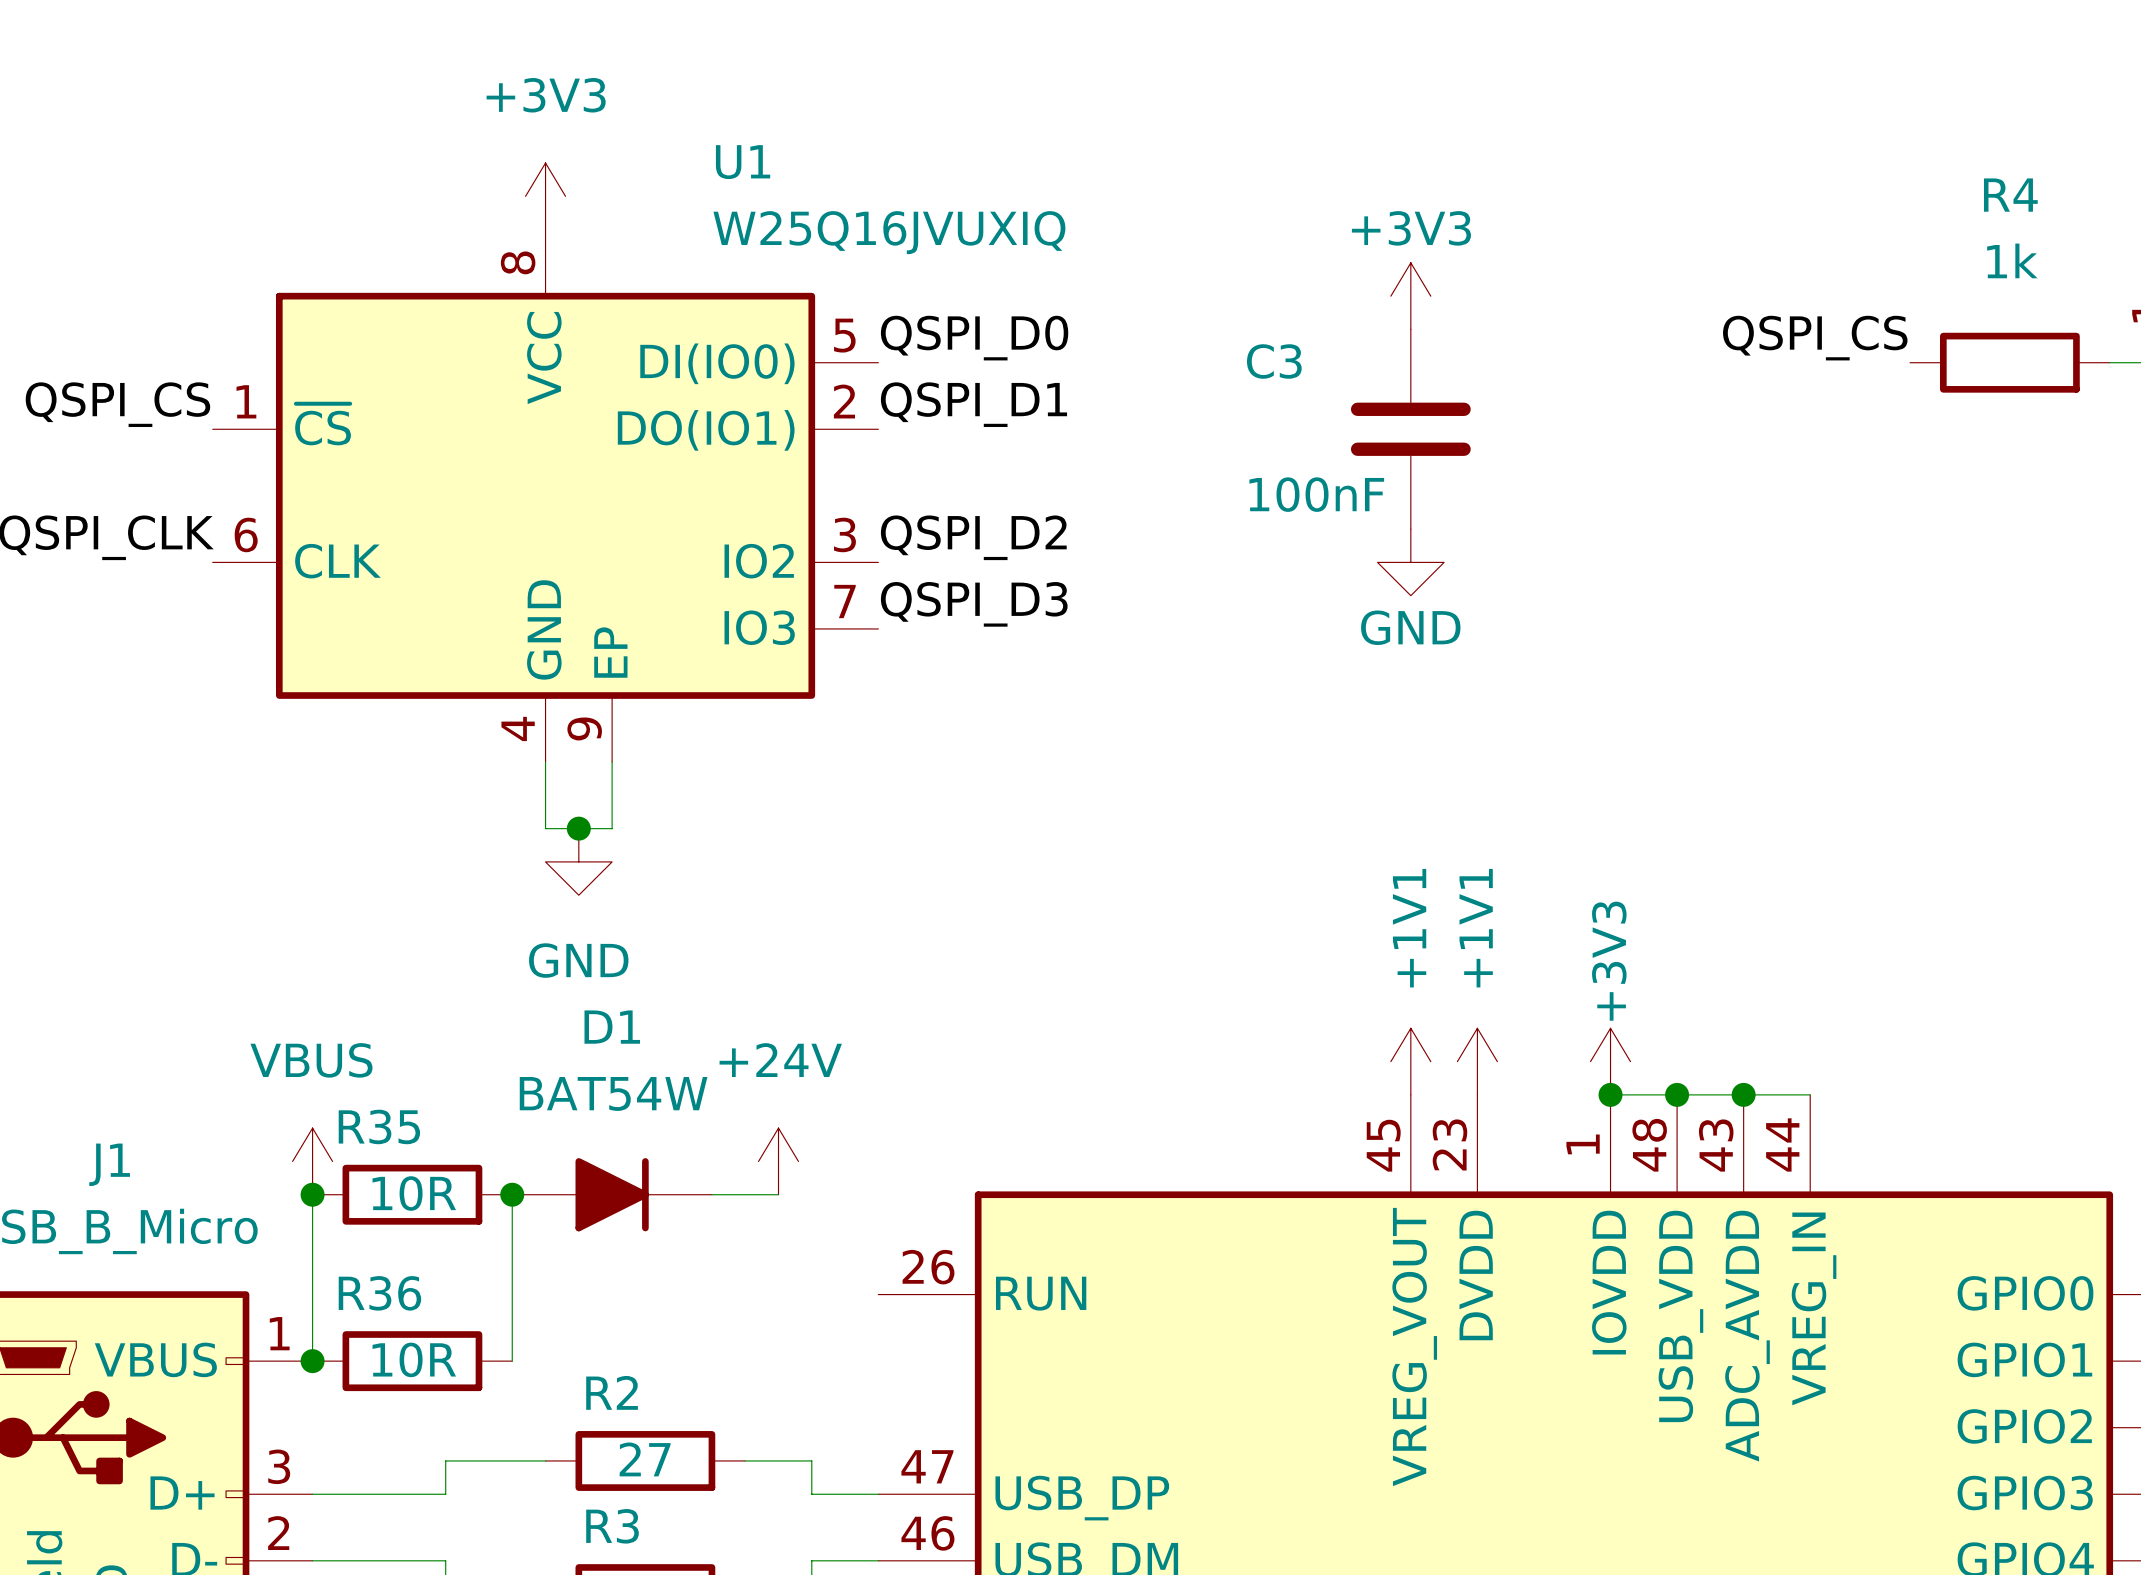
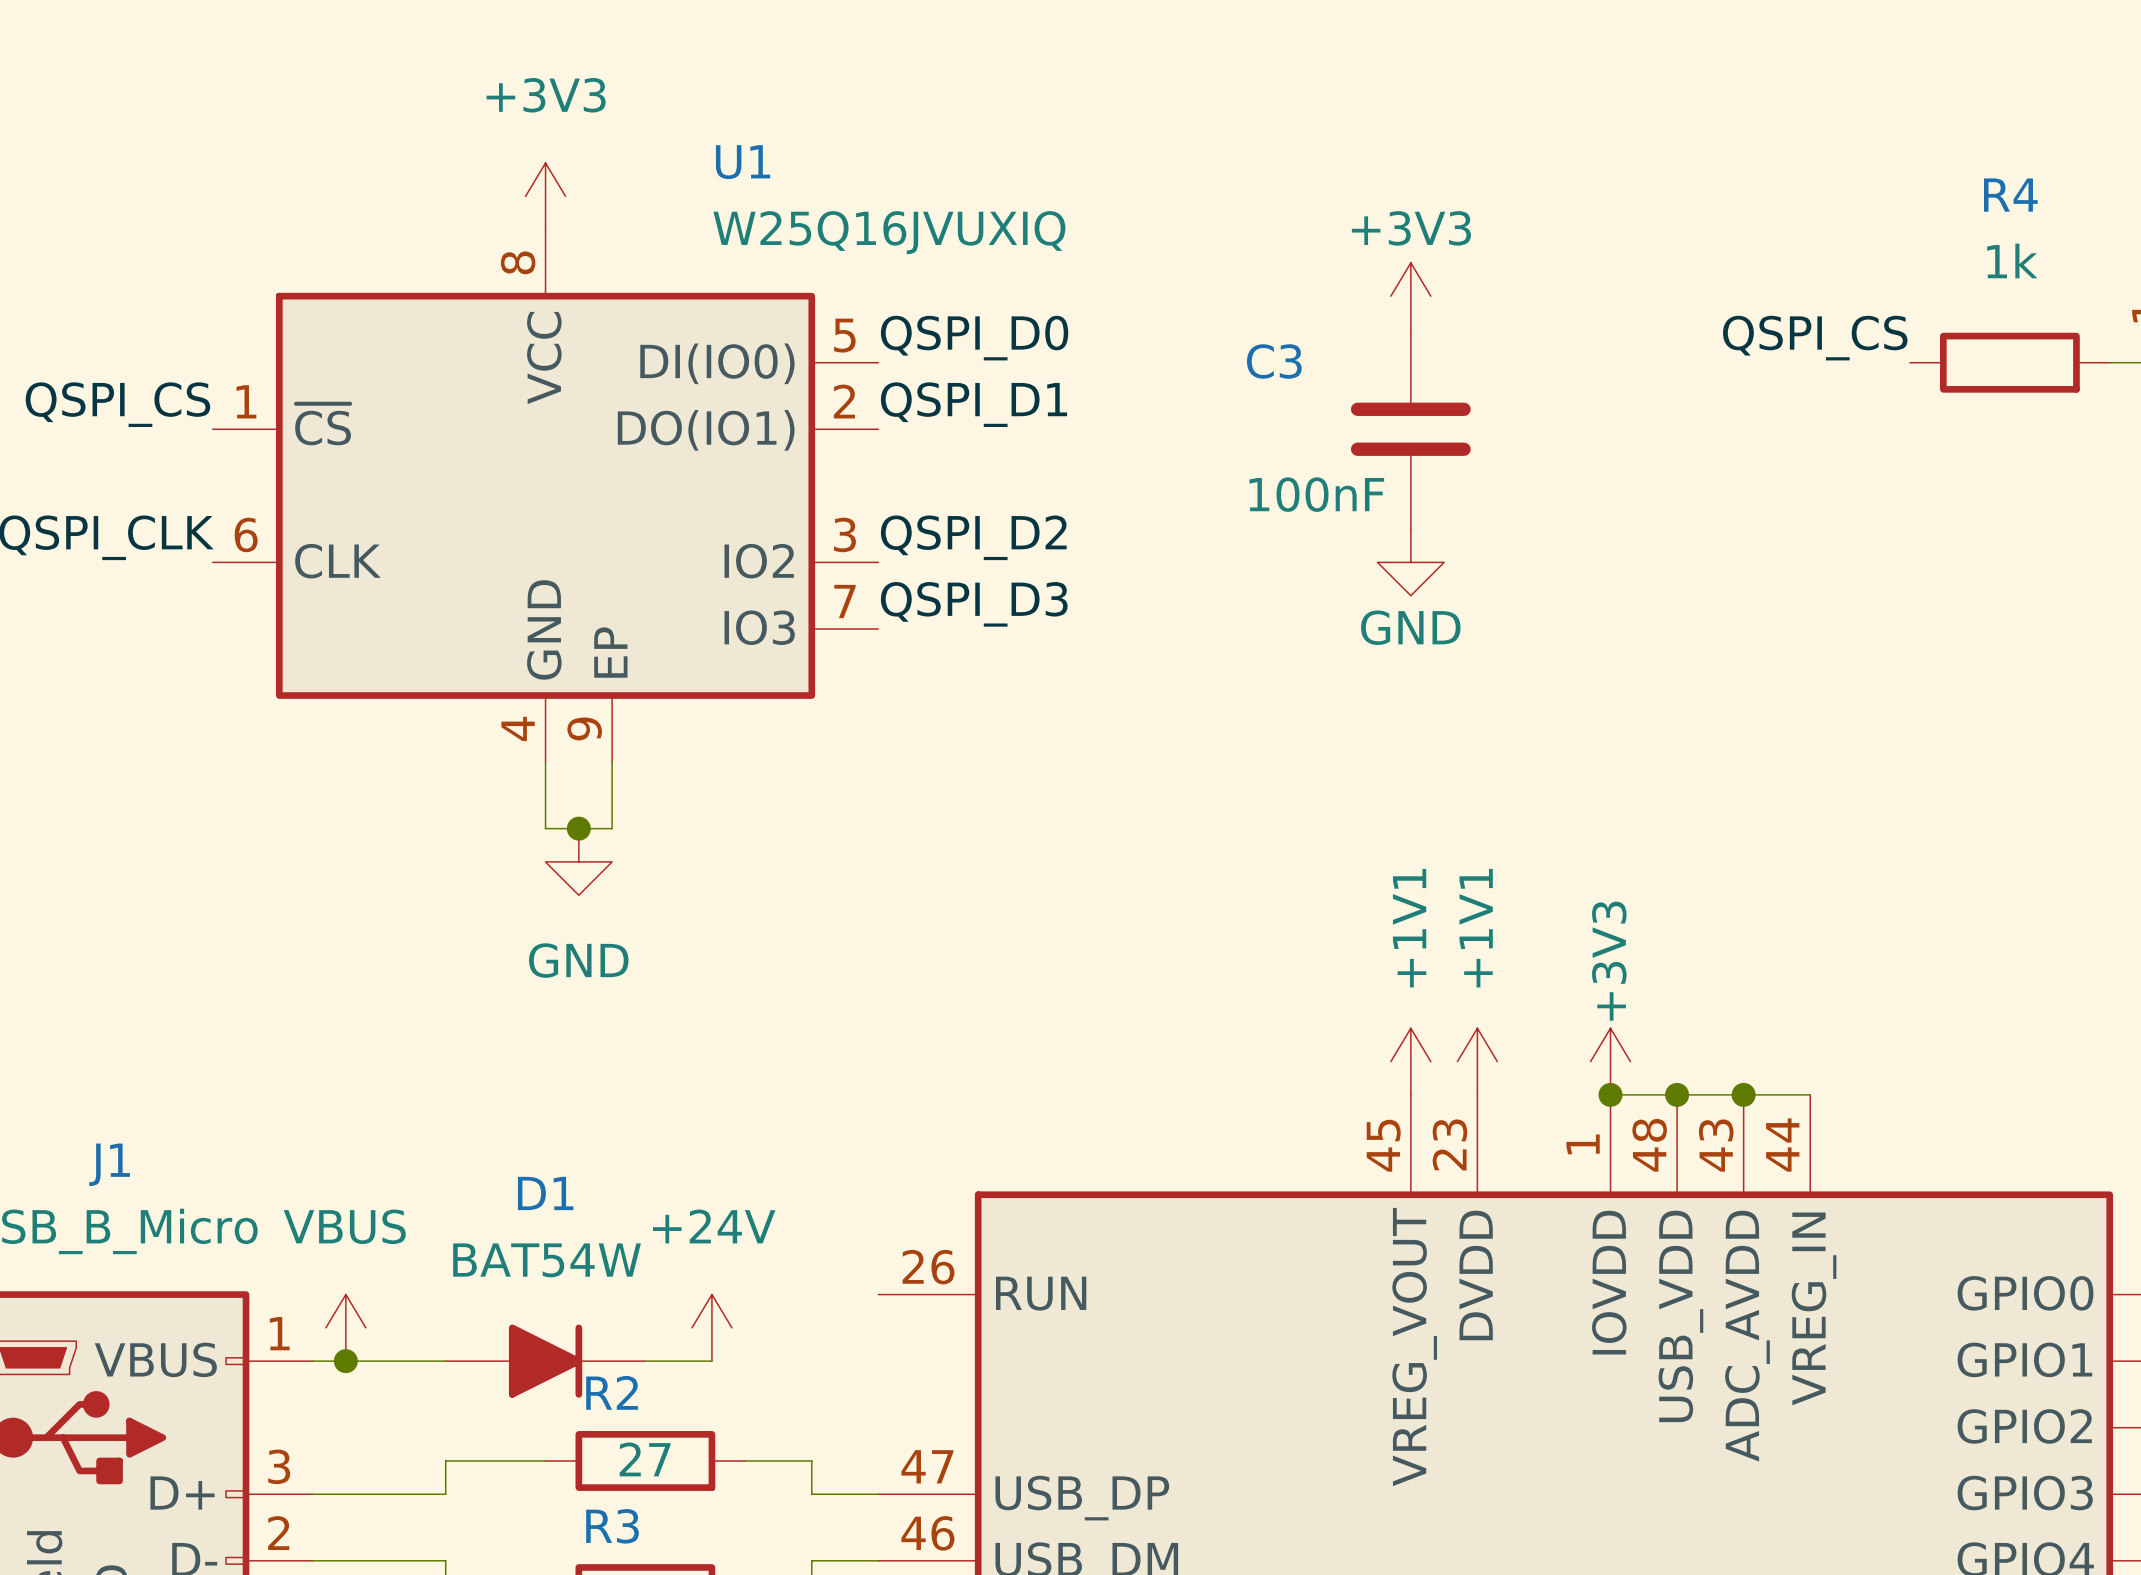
power symbol position: VBUS (312, 1161) -> VBUS (345, 1327)
power symbol position: +24V (778, 1161) -> +24V (711, 1327)
wire: (312, 1194) (312, 1361) -> (445, 1361) (312, 1361)
junction: (312, 1194) -> none
R35: 10R (412, 1194) -> none
wire: (512, 1194) (512, 1361) -> none
junction: (512, 1194) -> none
D1 position: (612, 1194) -> (545, 1361)
wire: (711, 1194) (778, 1194) -> (645, 1361) (711, 1361)
junction position: (312, 1361) -> (345, 1361)
R36: 10R (412, 1361) -> none

